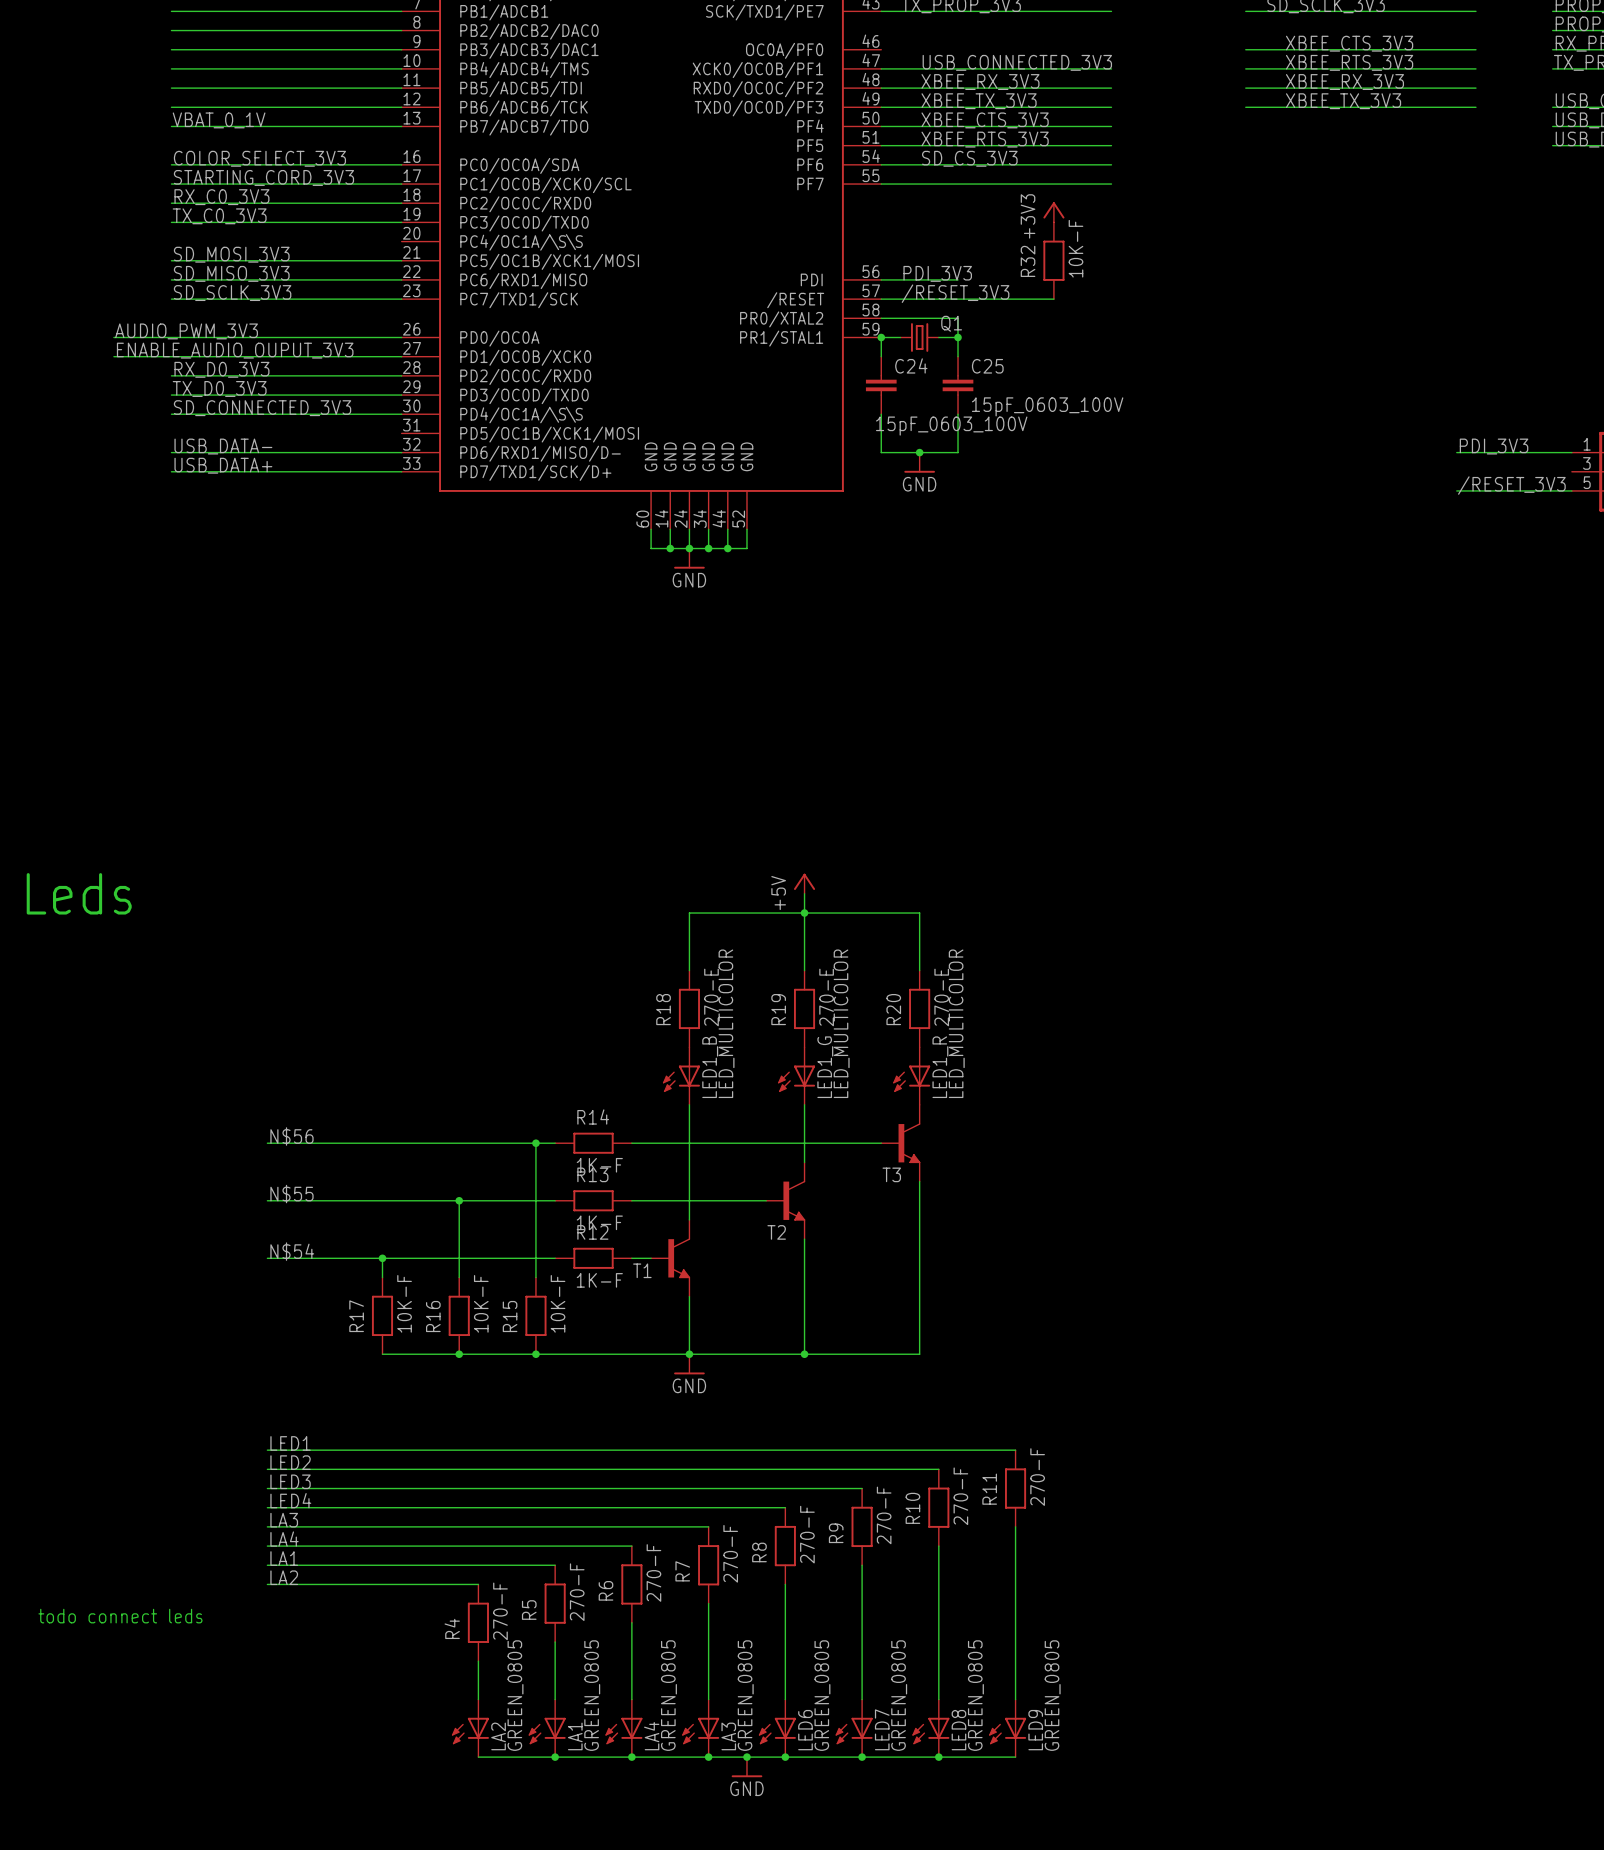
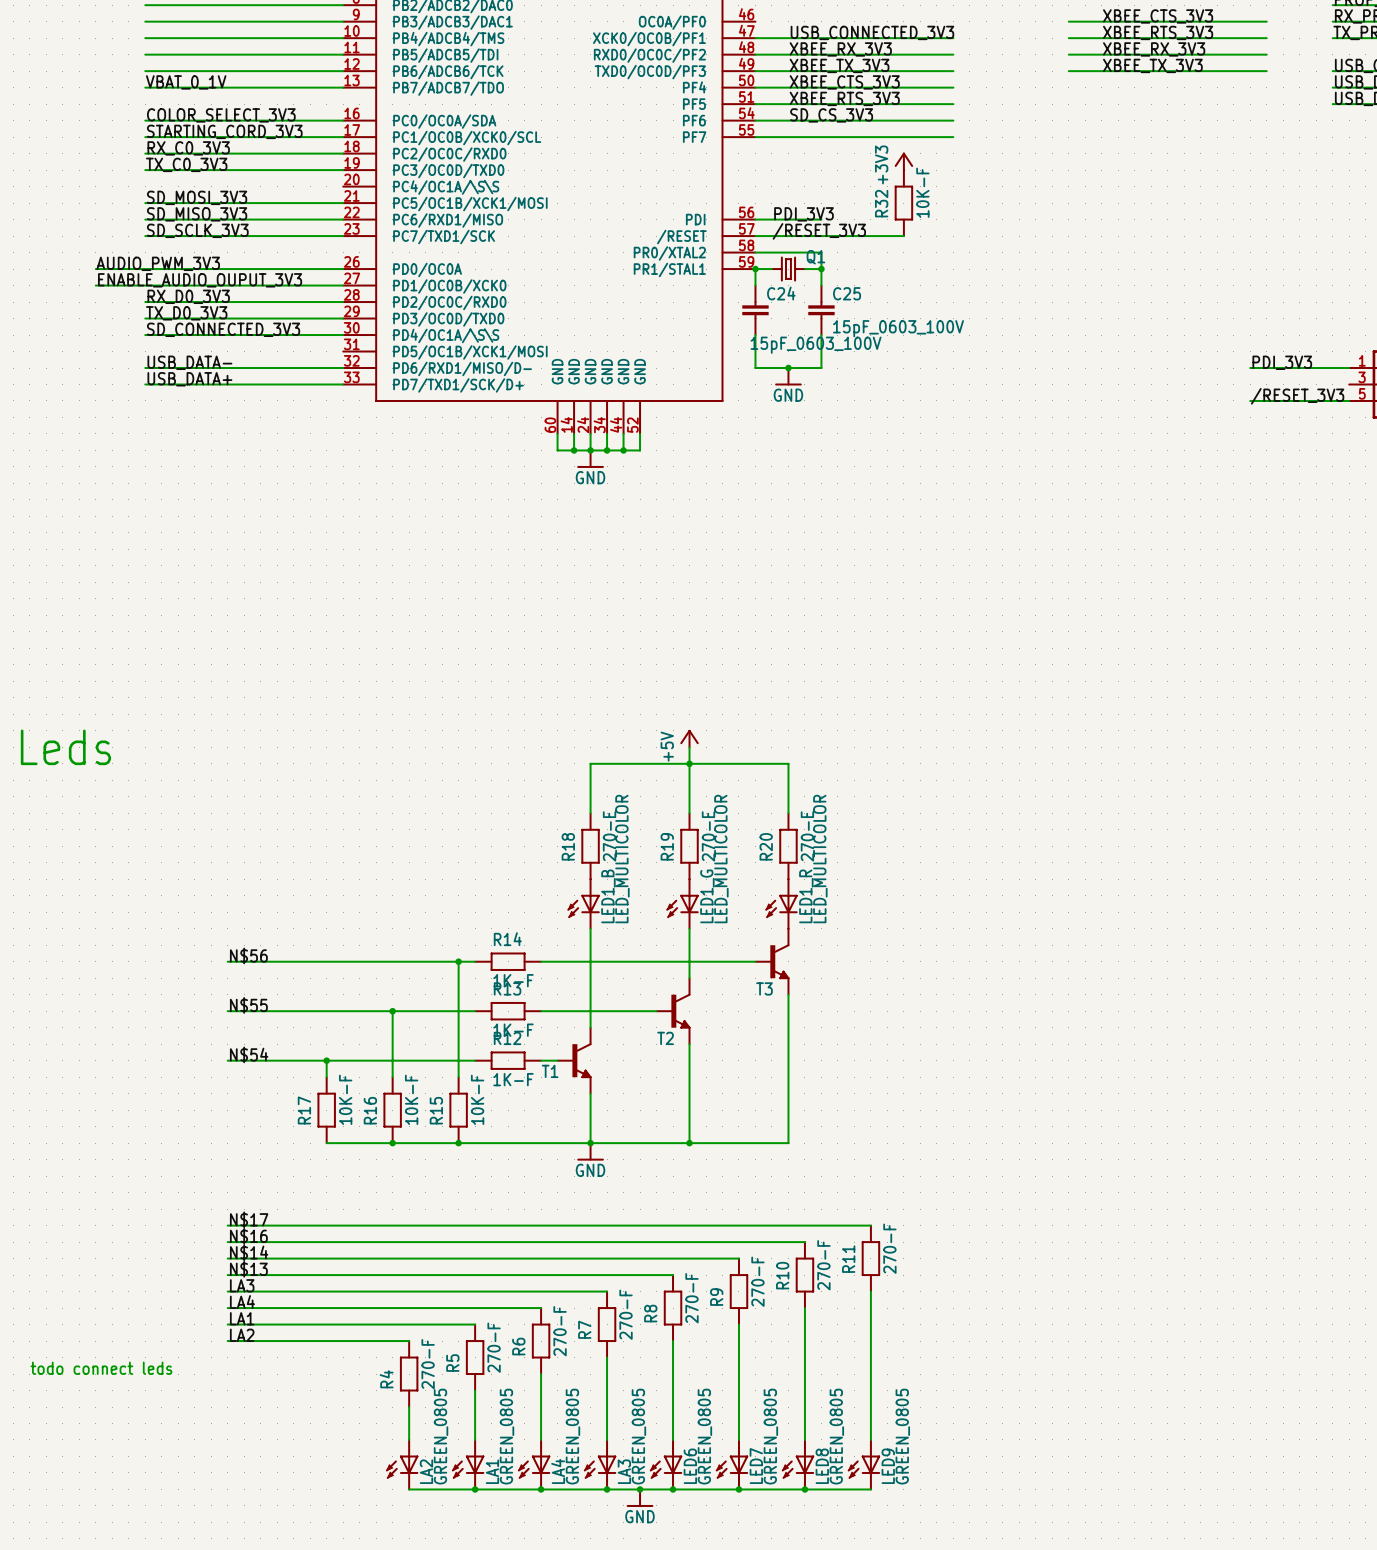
label: LED1 (290, 1443) -> N$17 (249, 1219)
label: LED2 (290, 1462) -> N$16 (248, 1236)
label: LED3 (290, 1481) -> N$14 (249, 1252)
label: LED4 (290, 1500) -> N$13 (248, 1269)

